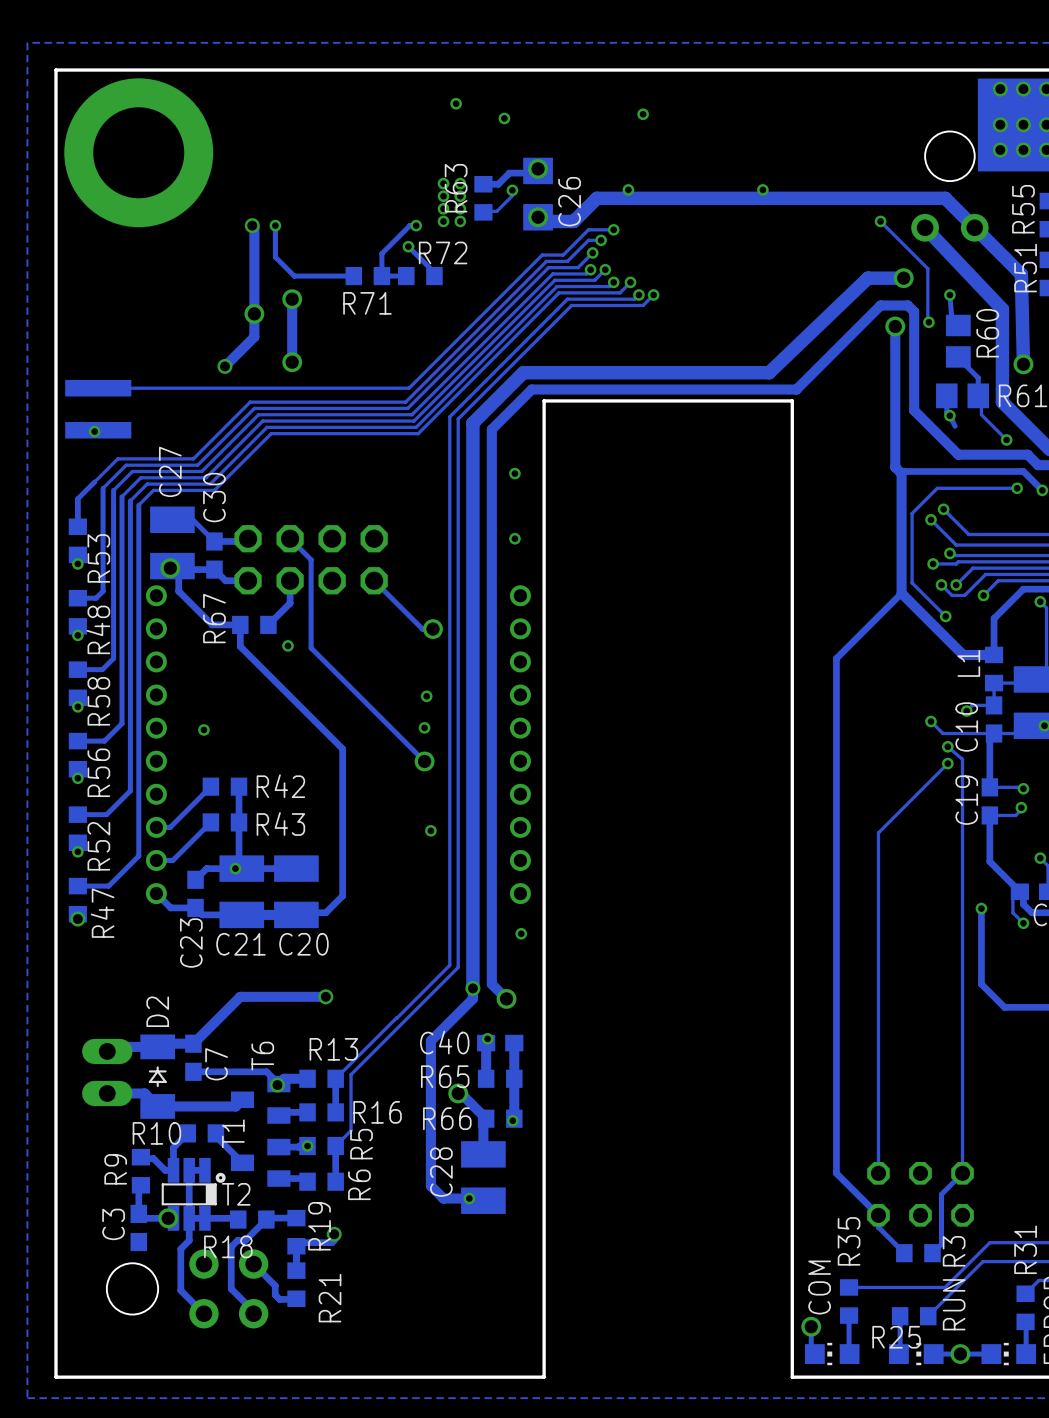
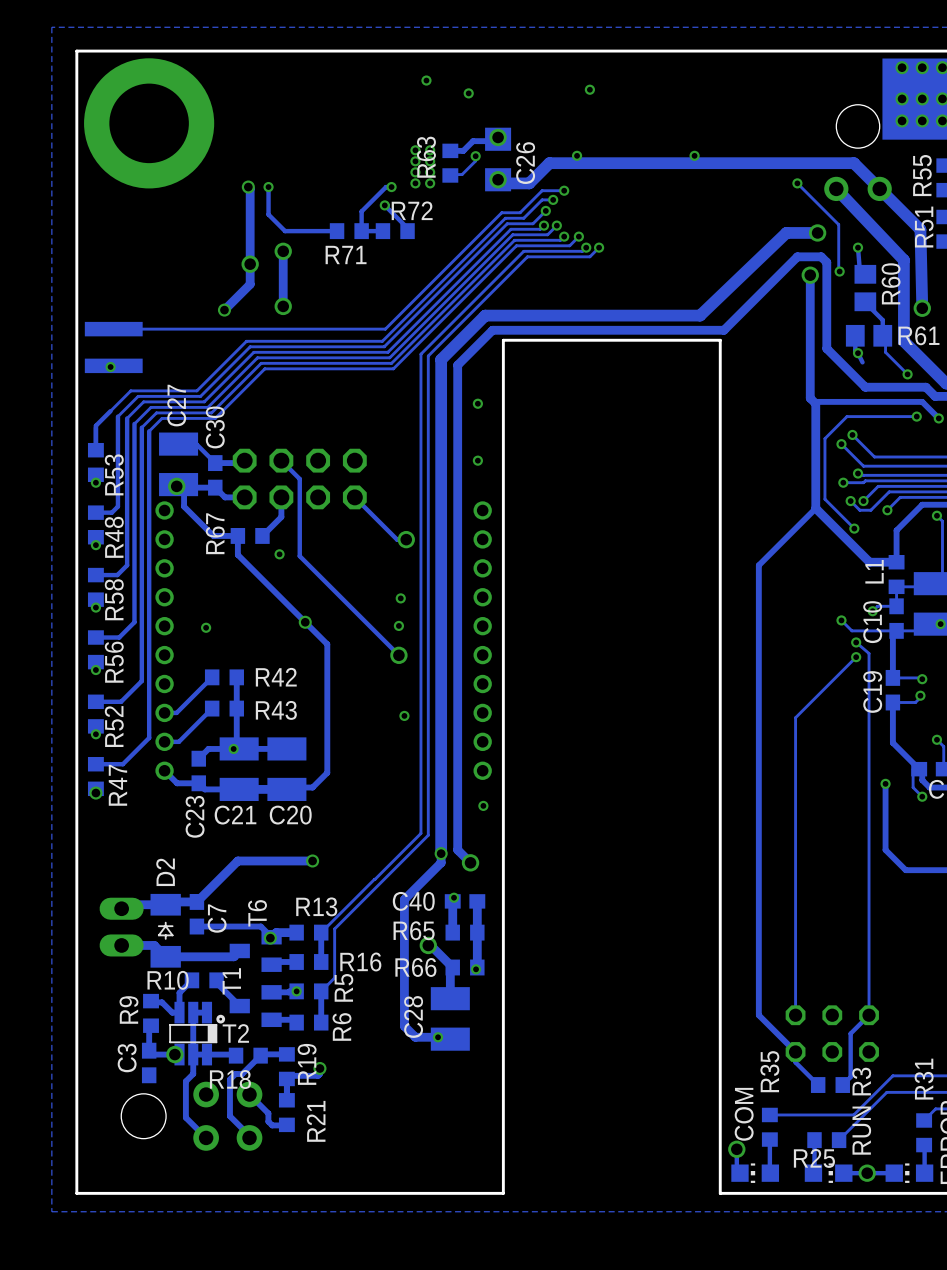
via: none -> (305, 622)

